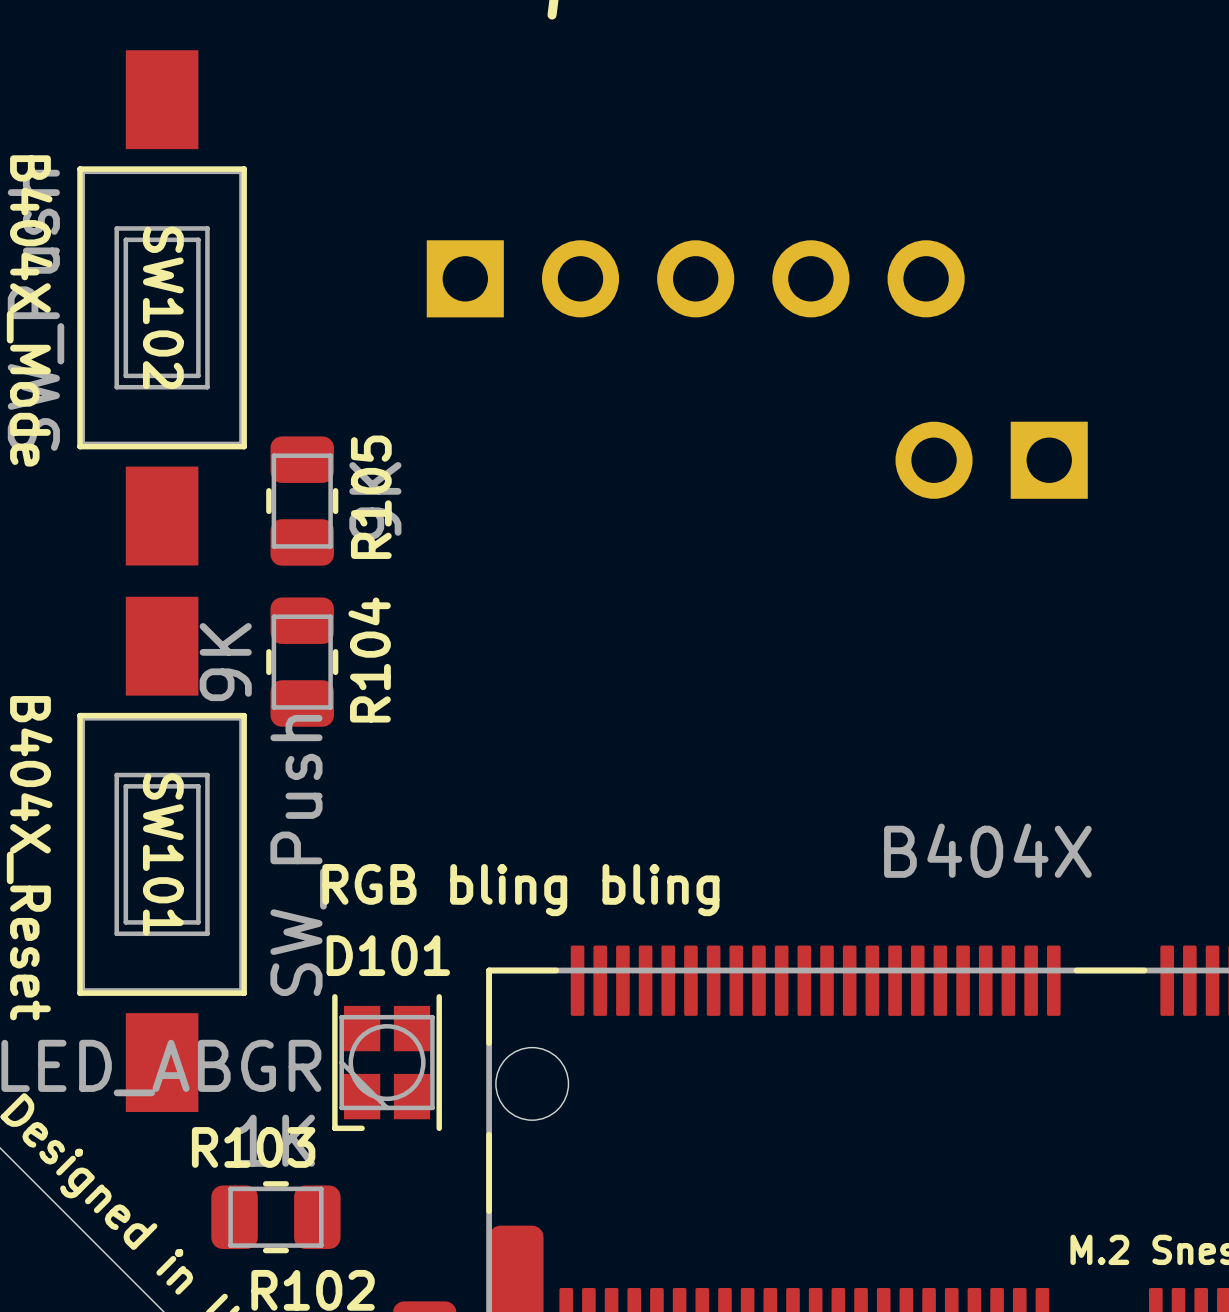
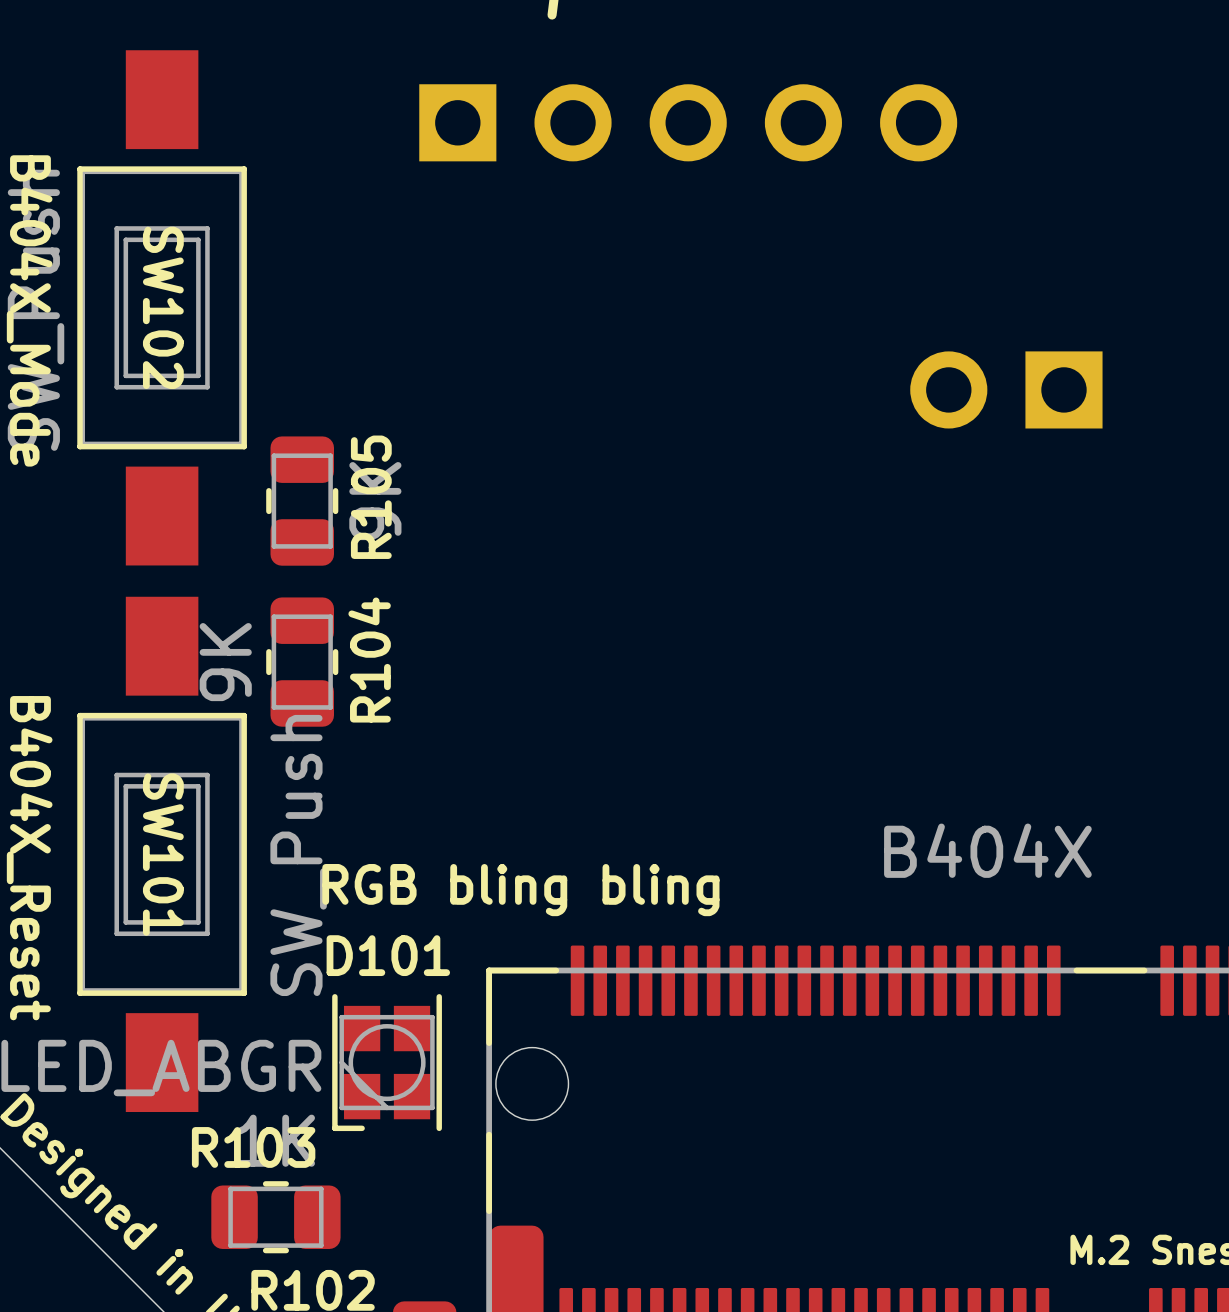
part position: (695, 278) -> (688, 122)
part position: (991, 460) -> (1006, 389)

